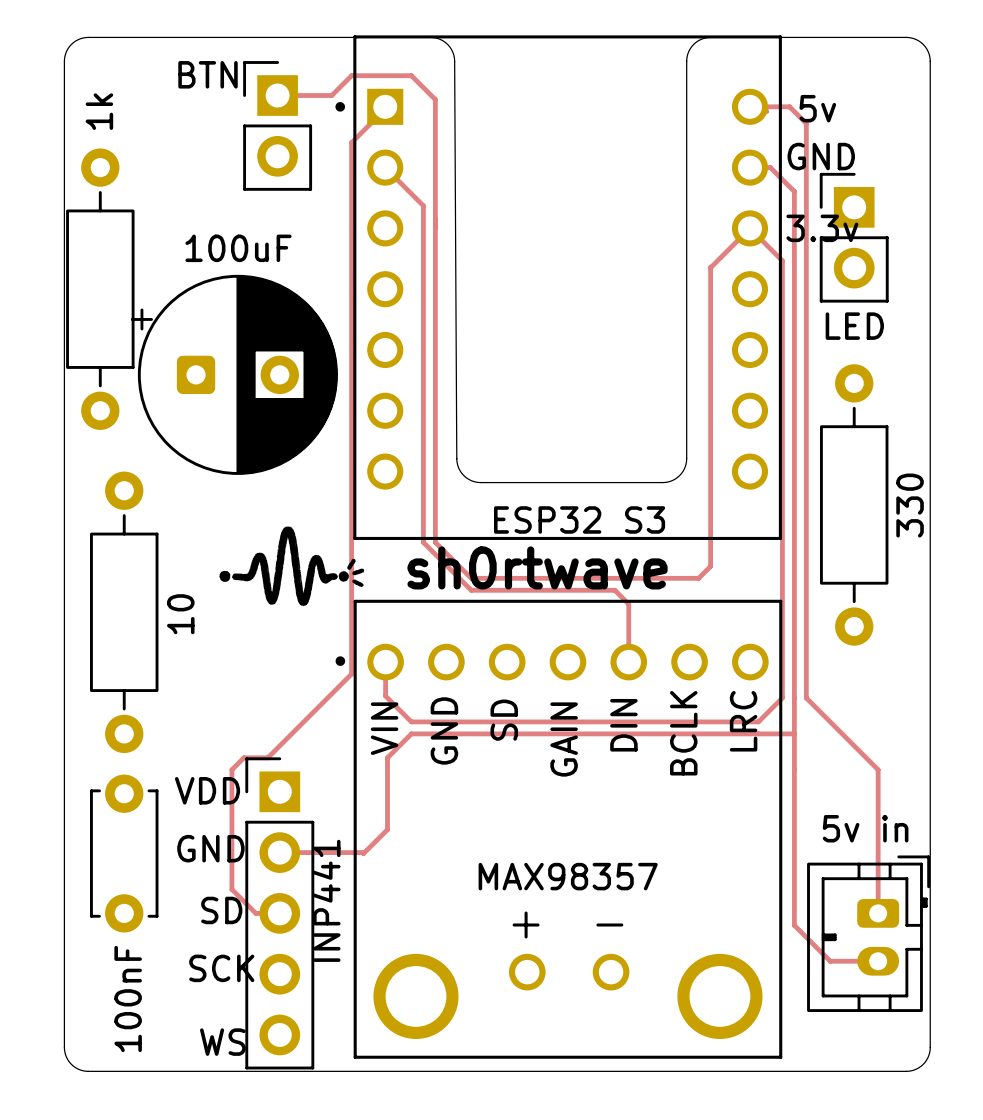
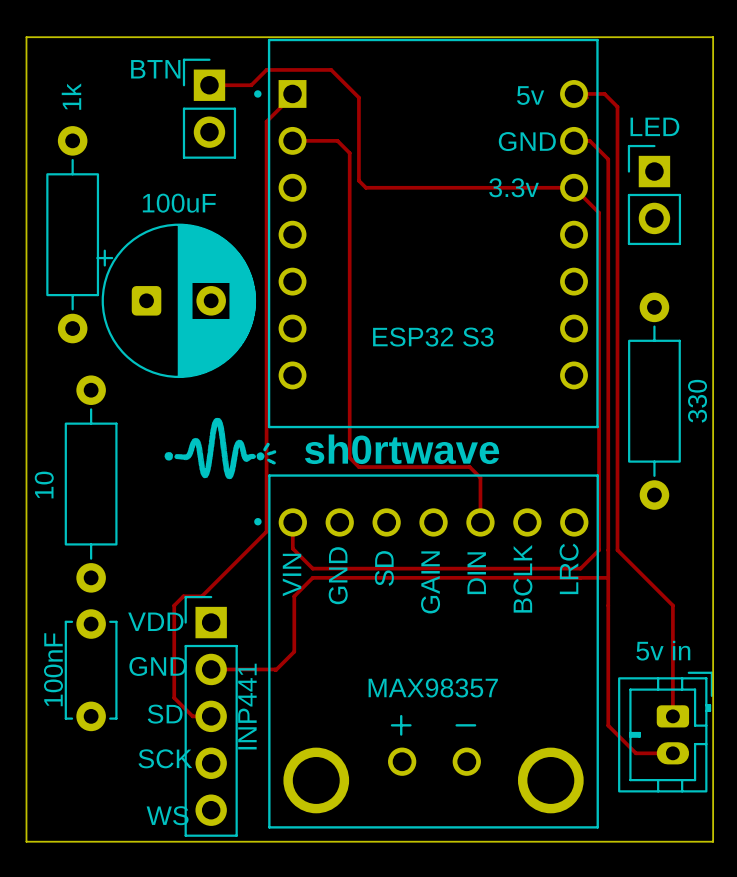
board edge: (930, 61) (928, 52) (923, 44) (915, 39) (906, 37) (710, 37) (697, 41) (690, 48) (686, 61) (686, 461) (683, 471) (677, 477) (662, 482) (477, 482) (466, 477) (458, 467) (456, 458) (454, 61) (452, 52) (445, 42) (430, 37) (88, 37) (77, 39) (71, 44) (66, 50) (64, 61) (64, 1047) (69, 1062) (77, 1068) (88, 1071) (906, 1071) (916, 1068) (923, 1064) (927, 1057) (930, 1047) -> (713, 58) (713, 37) (26, 37) (26, 841) (713, 841) (713, 819)
track: (411, 75) (435, 99) (435, 542) (471, 578) (698, 578) (710, 566) (710, 267) (749, 228) -> (312, 69) (331, 69) (358, 97) (358, 180) (365, 187) (574, 187)
text position: 5v (817, 108) -> 5v (530, 95)
text position: GND (821, 156) -> GND (527, 141)
track: (385, 167) (423, 205) (423, 542) (459, 578) -> (292, 140) (337, 140) (349, 153) (349, 457)
text position: 3.3v (822, 228) -> 3.3v (514, 187)
LED name position: LED (854, 326) -> LED (654, 126)
ESP32 S3 name position: ESP32 S3 (579, 519) -> ESP32 S3 (433, 337)
10 name position: 10 (180, 614) -> 10 (44, 485)
100nF name position: 100nF (128, 998) -> 100nF (53, 669)

